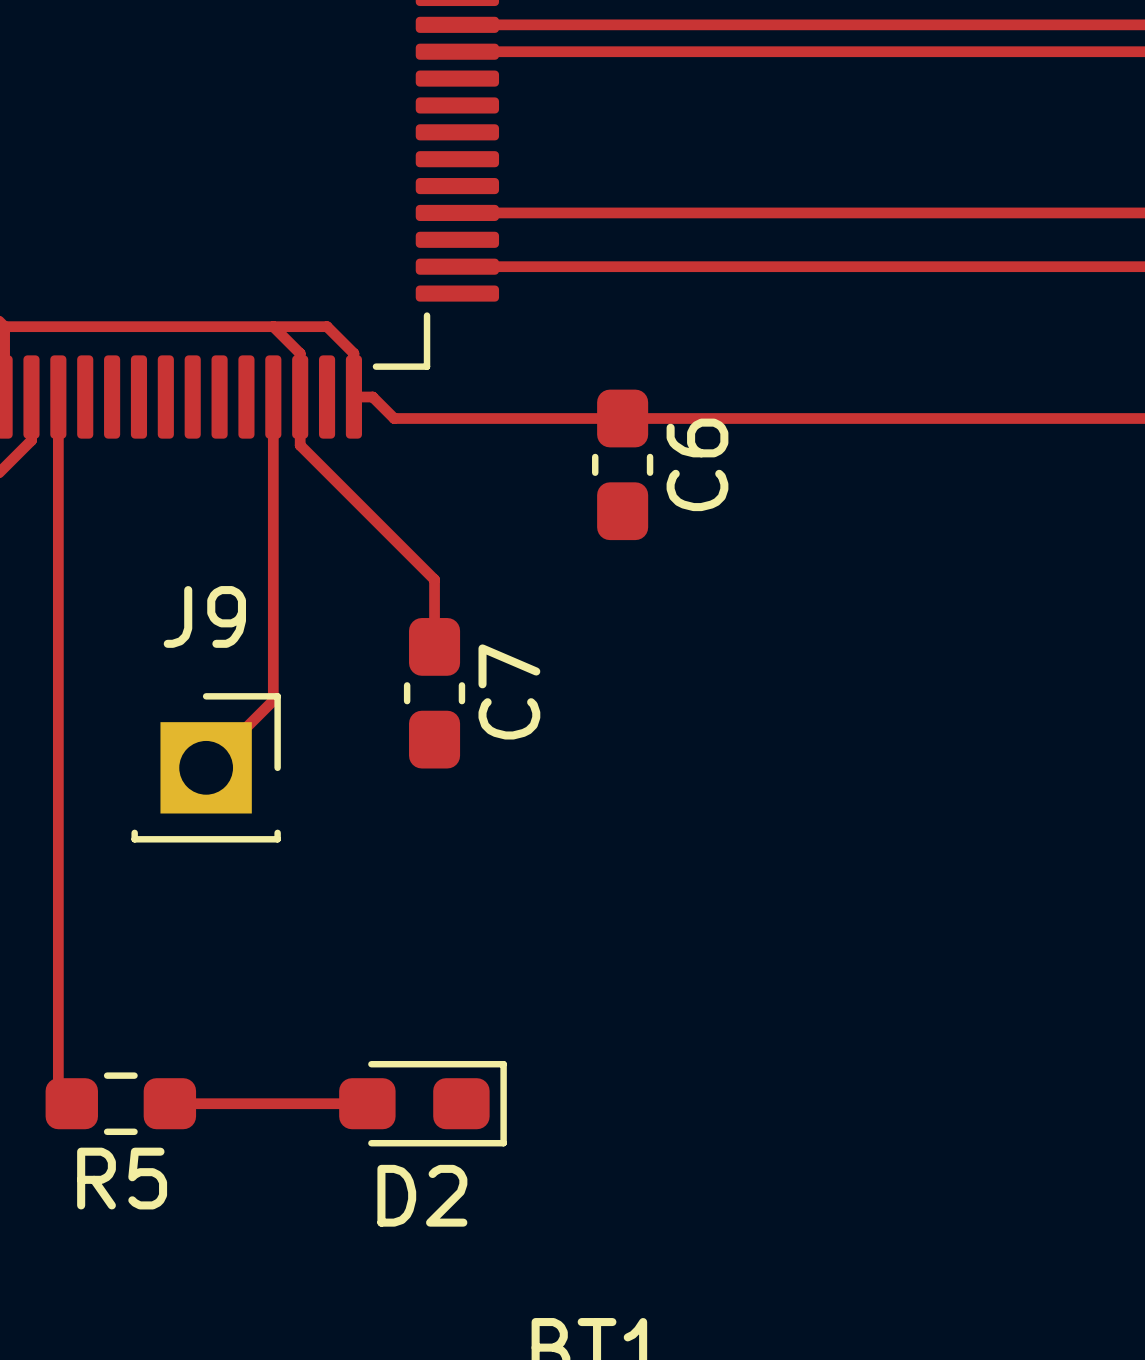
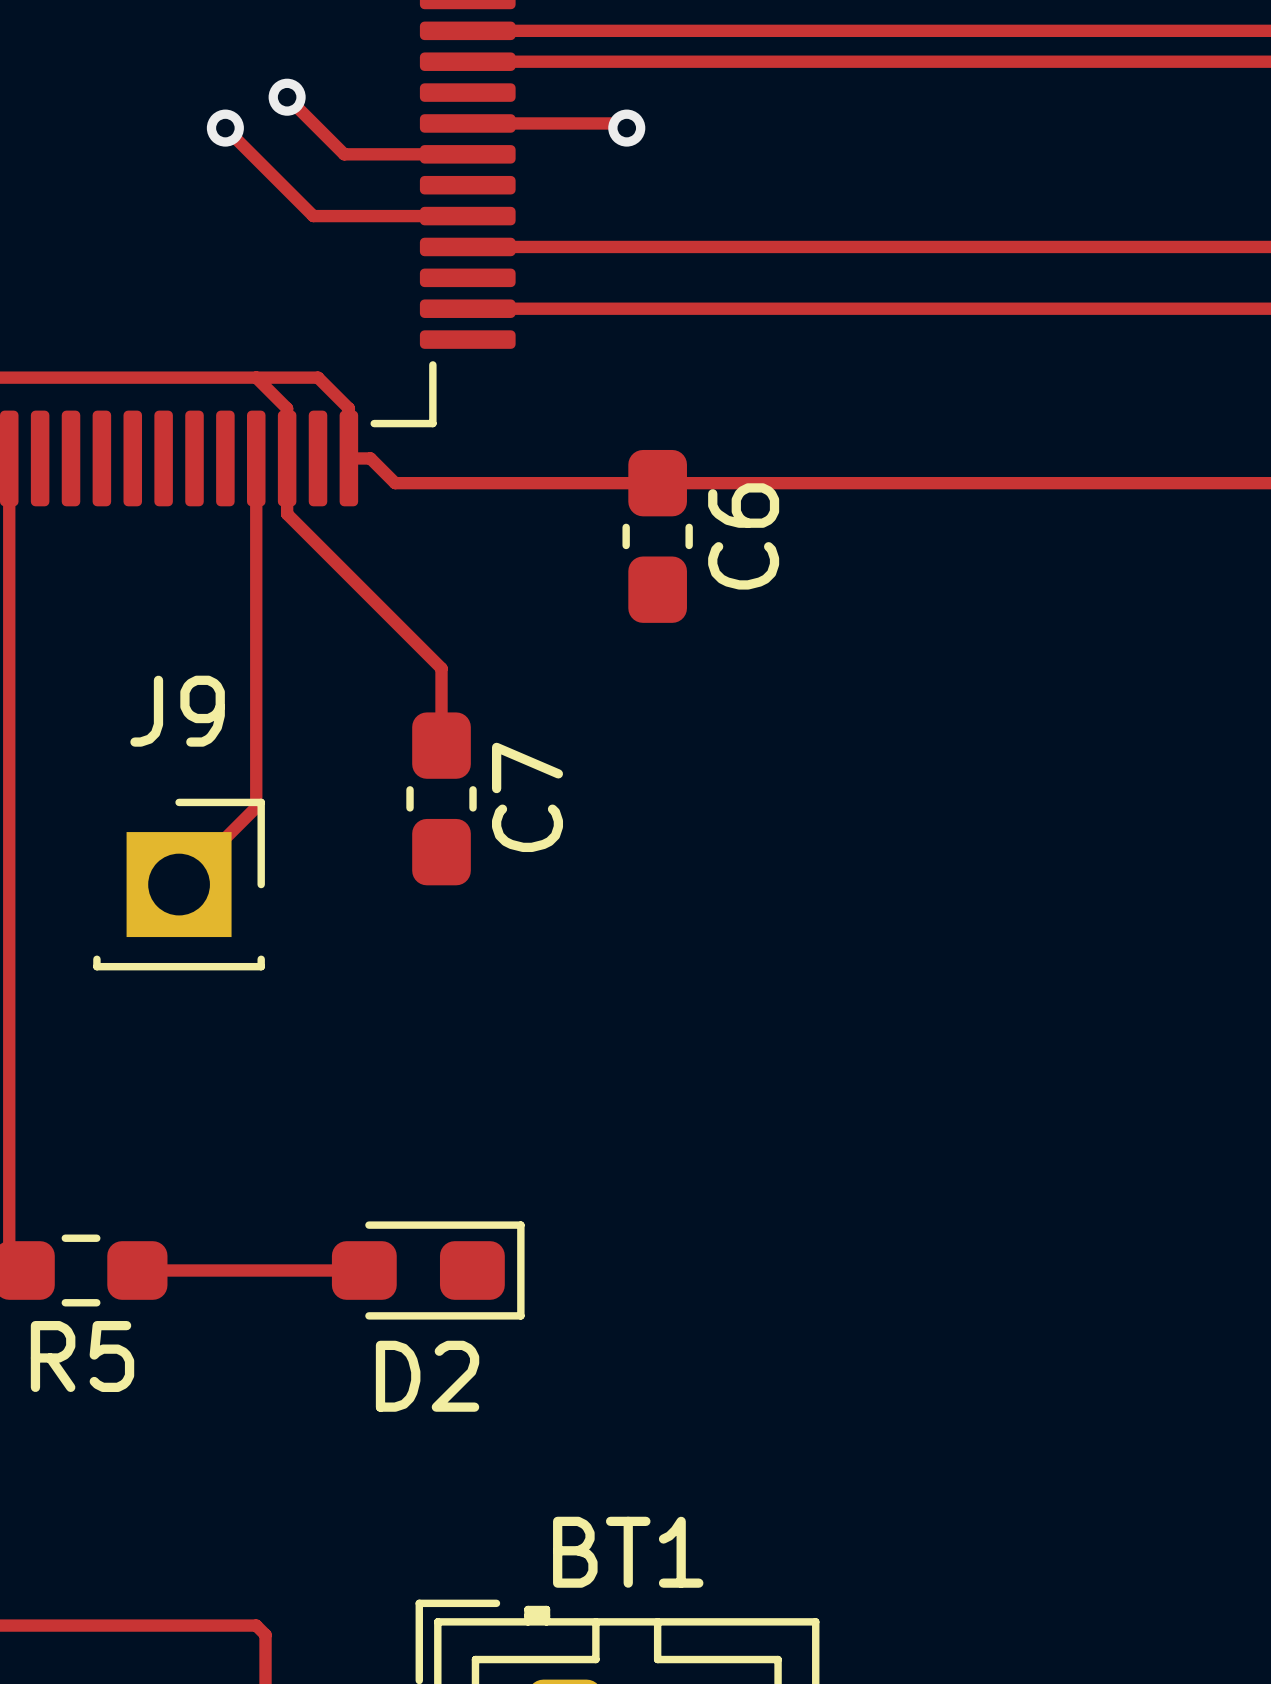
track: none -> (287, 97) (344, 154) (467, 154)
via: none -> (287, 97)
track: none -> (467, 123) (622, 123) (626, 128)
track: none -> (225, 128) (313, 216) (467, 216)
via: none -> (225, 128)
via: none -> (626, 128)

